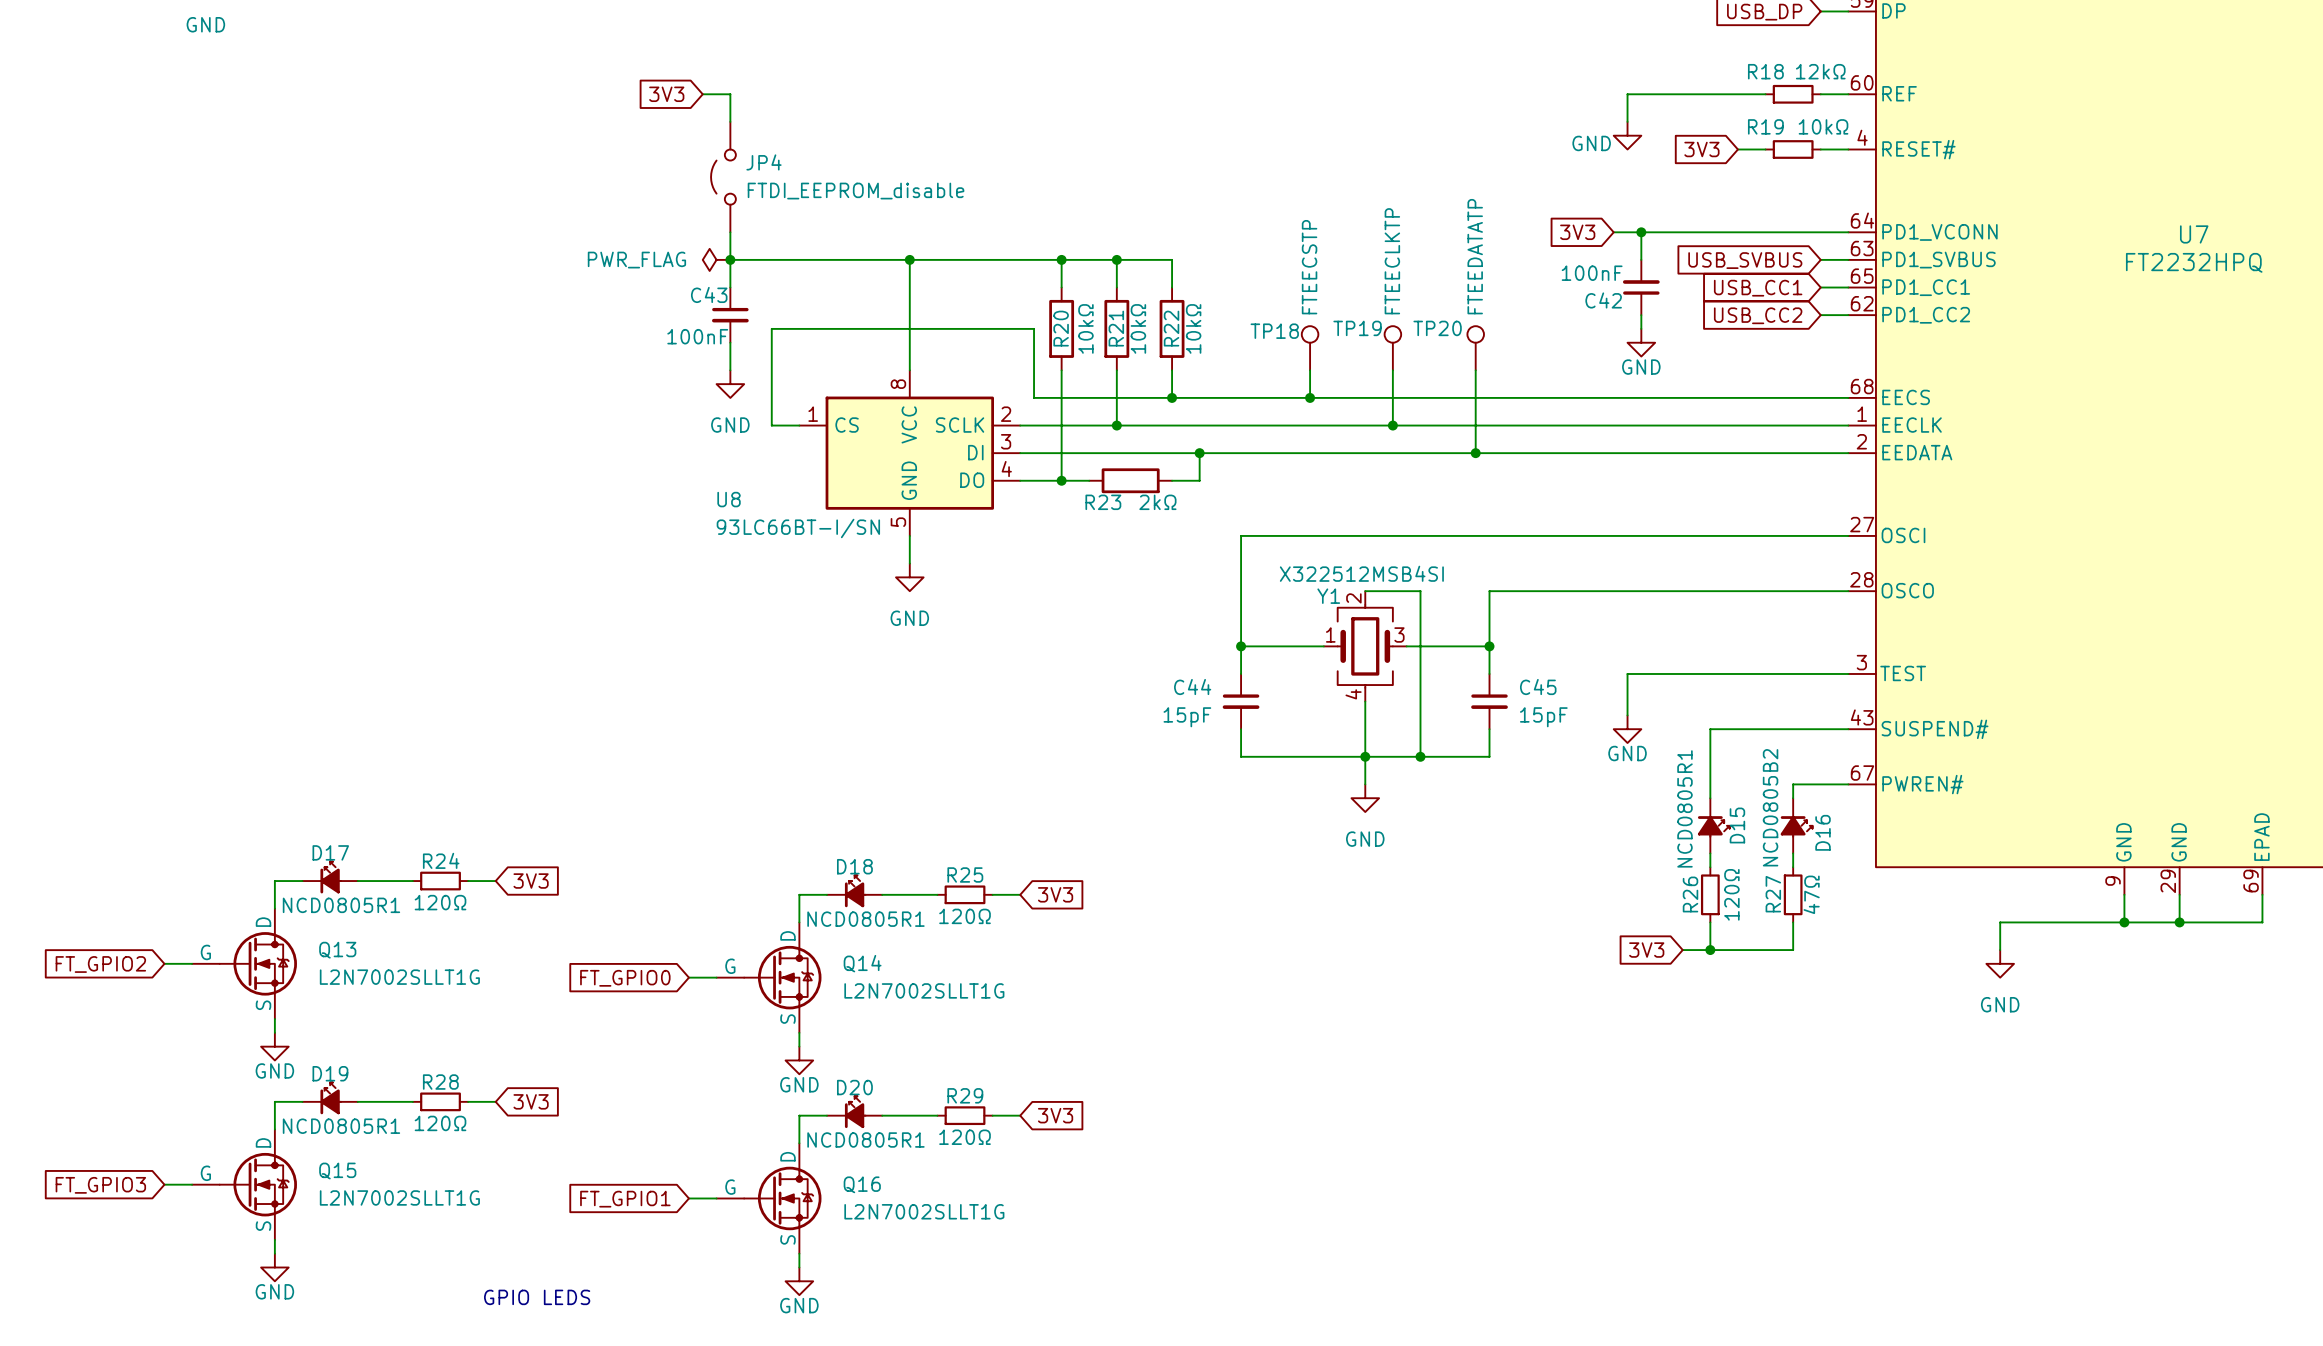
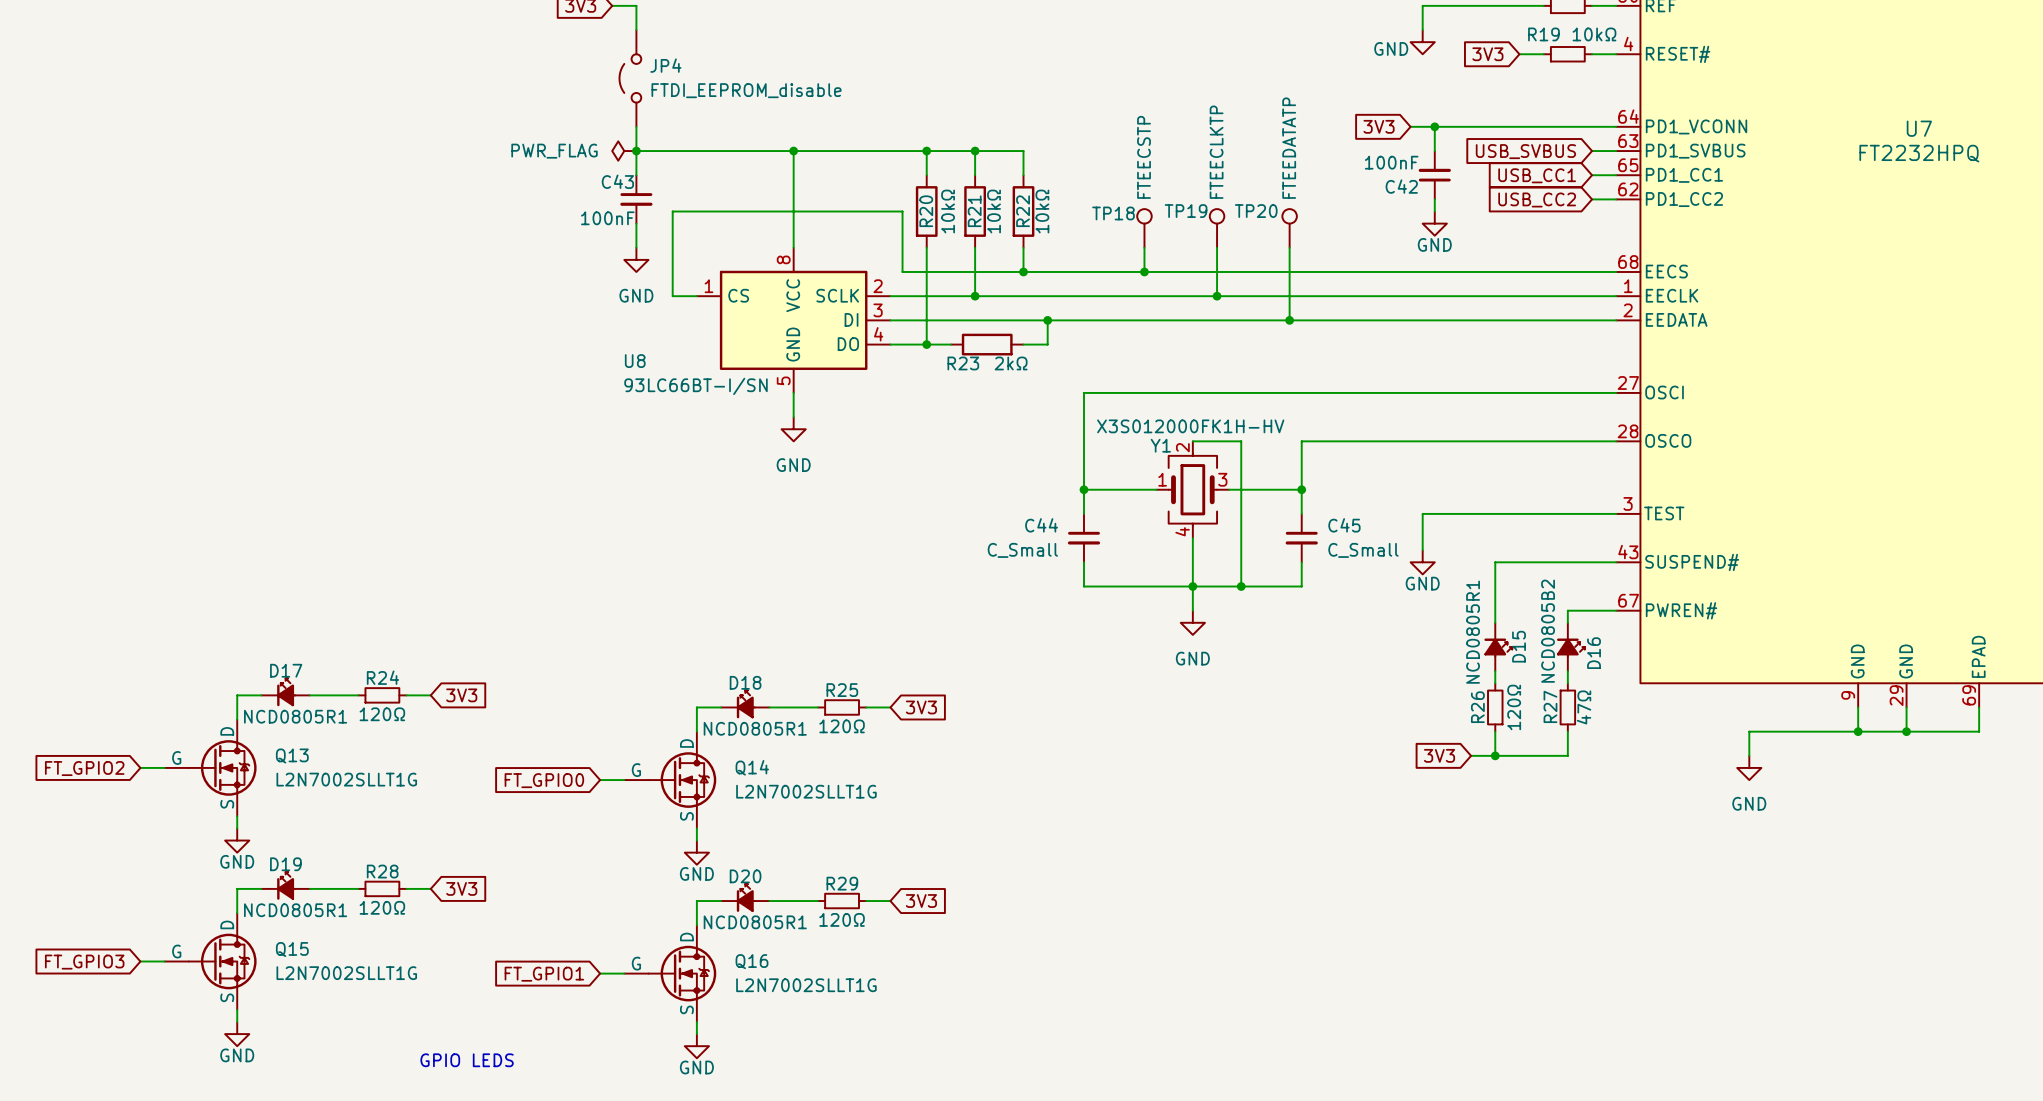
Y1 value: X322512MSB4SI (1361, 573) -> X3S012000FK1H-HV (1190, 426)
C44 value: 15pF (1187, 717) -> C_Small (1022, 550)
C45 value: 15pF (1543, 717) -> C_Small (1363, 550)

